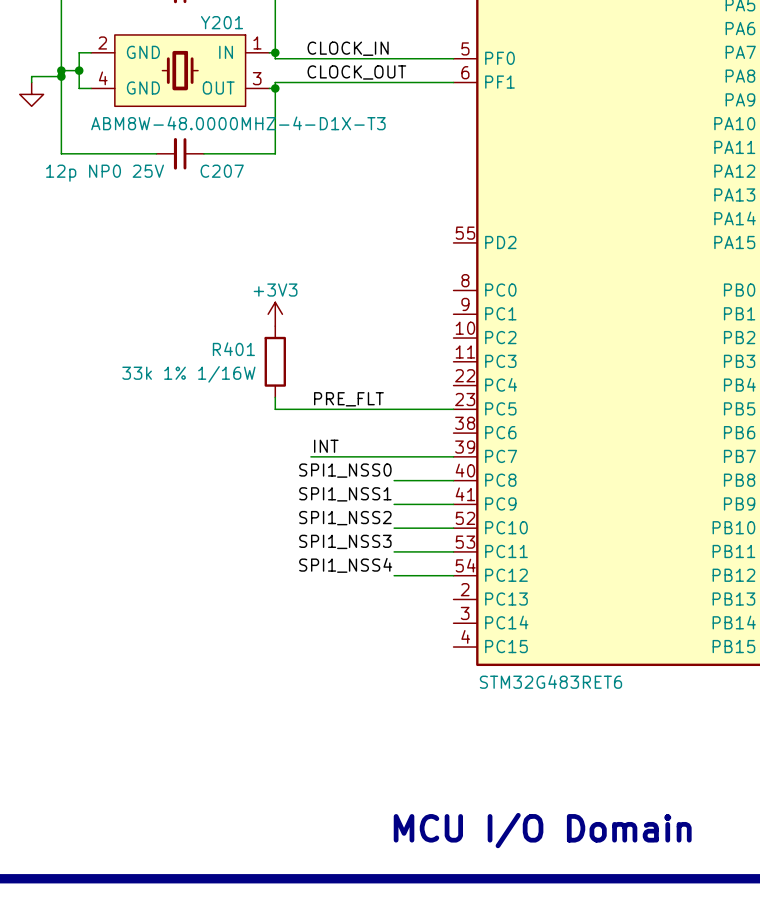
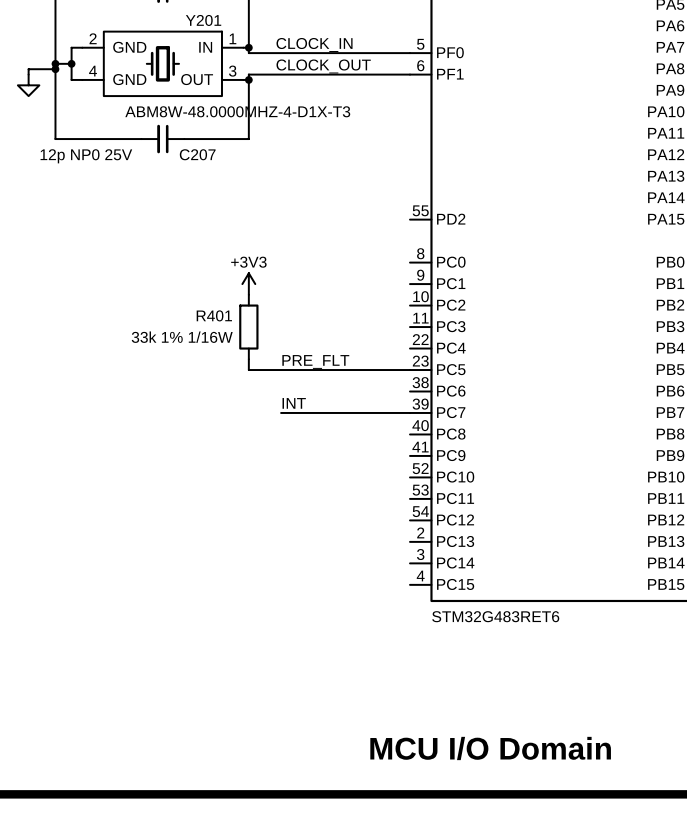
label: SPI1_NSS0 (345, 470) -> none
wire: (394, 480) (453, 480) -> none
label: SPI1_NSS1 (345, 494) -> none
wire: (394, 504) (453, 504) -> none
label: SPI1_NSS2 (345, 518) -> none
wire: (394, 528) (453, 528) -> none
label: SPI1_NSS3 (345, 541) -> none
wire: (394, 551) (453, 551) -> none
label: SPI1_NSS4 (345, 565) -> none
wire: (394, 575) (453, 575) -> none

